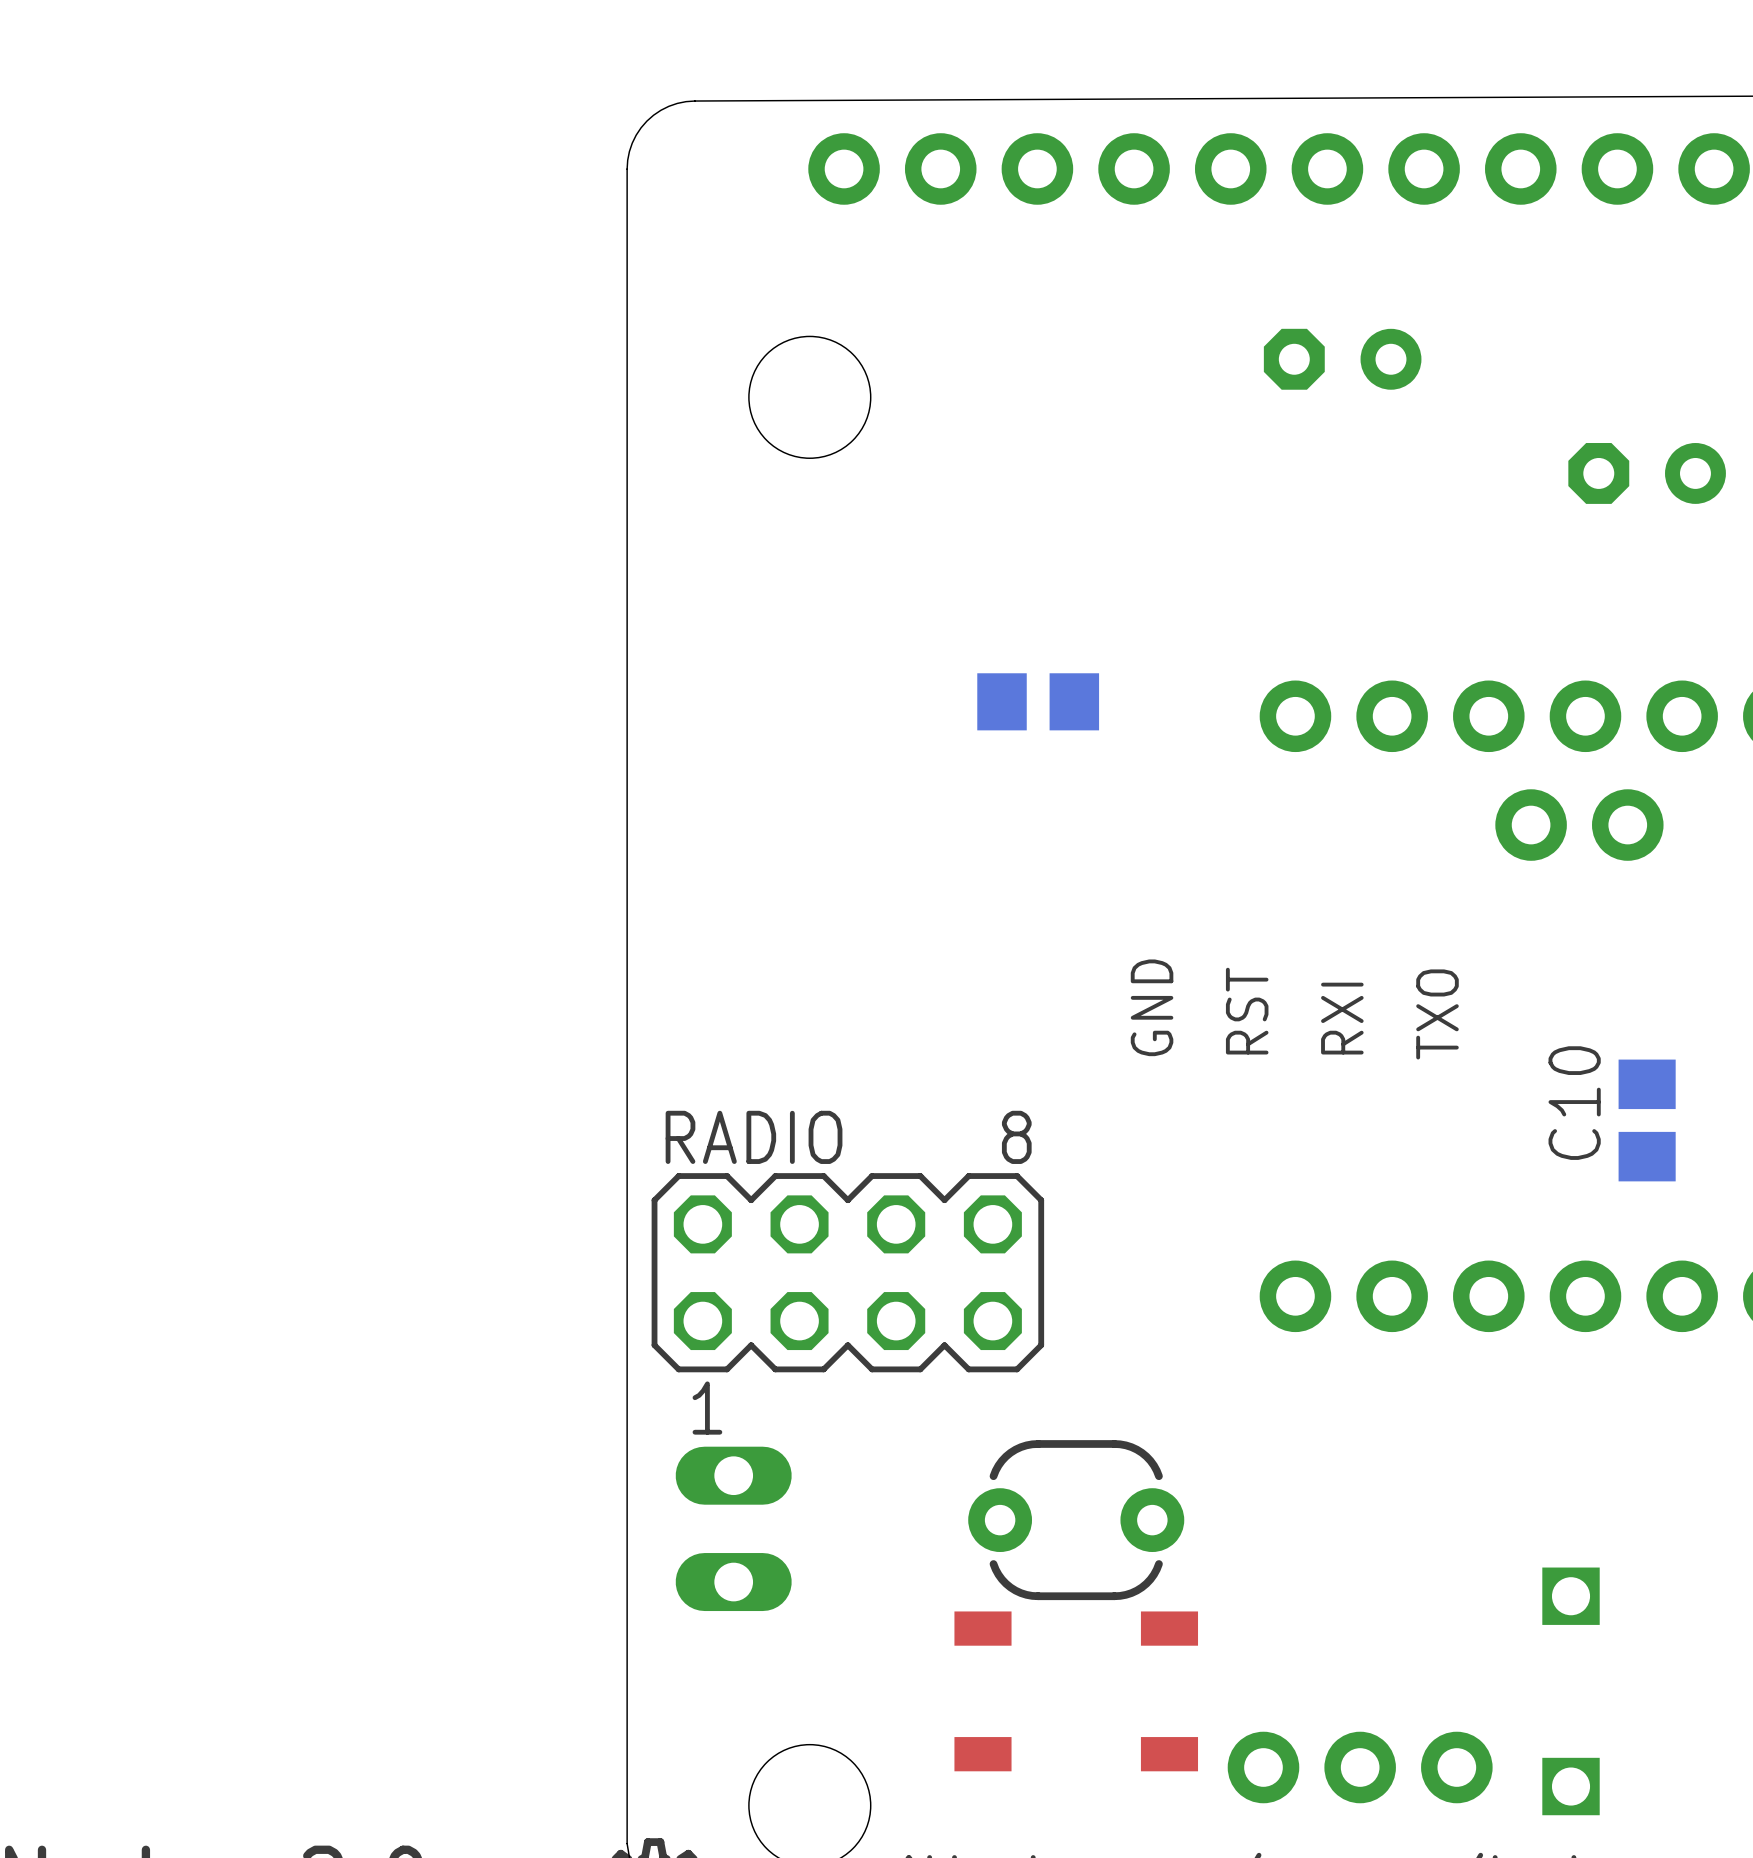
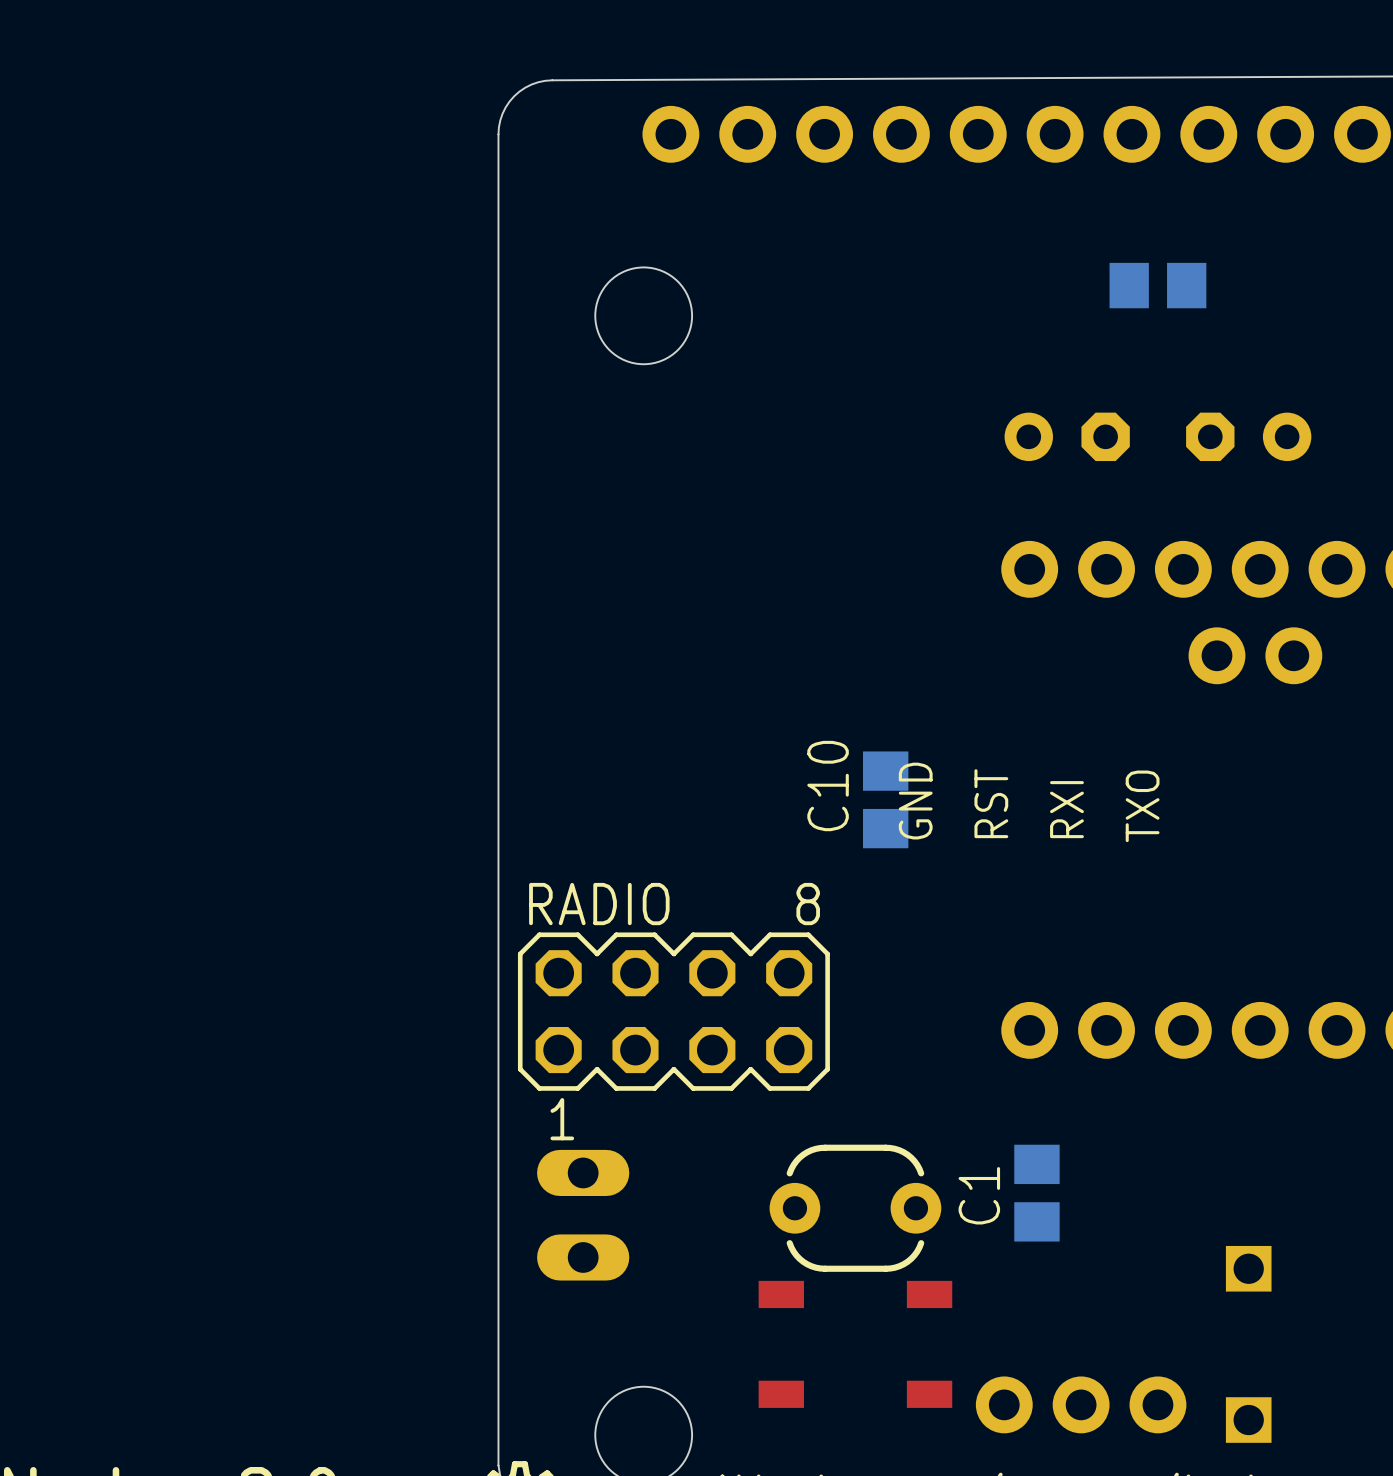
part: (1342, 359) -> none
part position: (1647, 473) -> (1248, 436)
part: none -> (1067, 436)
part position: (1038, 701) -> (1157, 285)
C10 position: (1647, 1120) -> (885, 799)
C1: none -> (1036, 1193)

